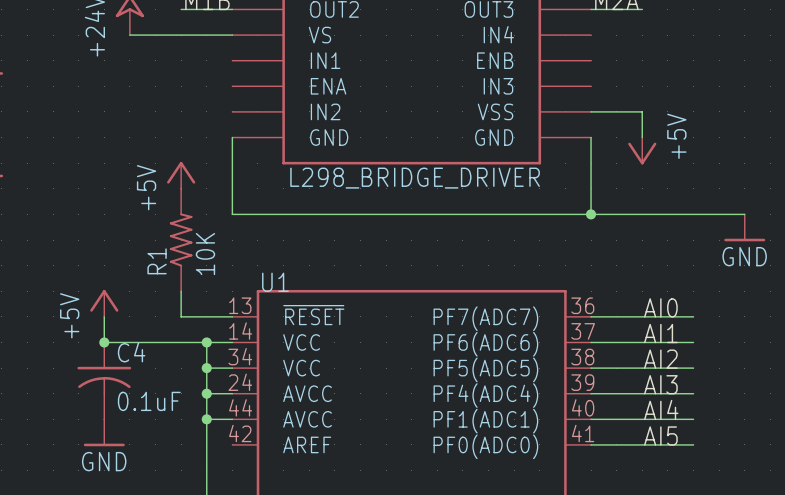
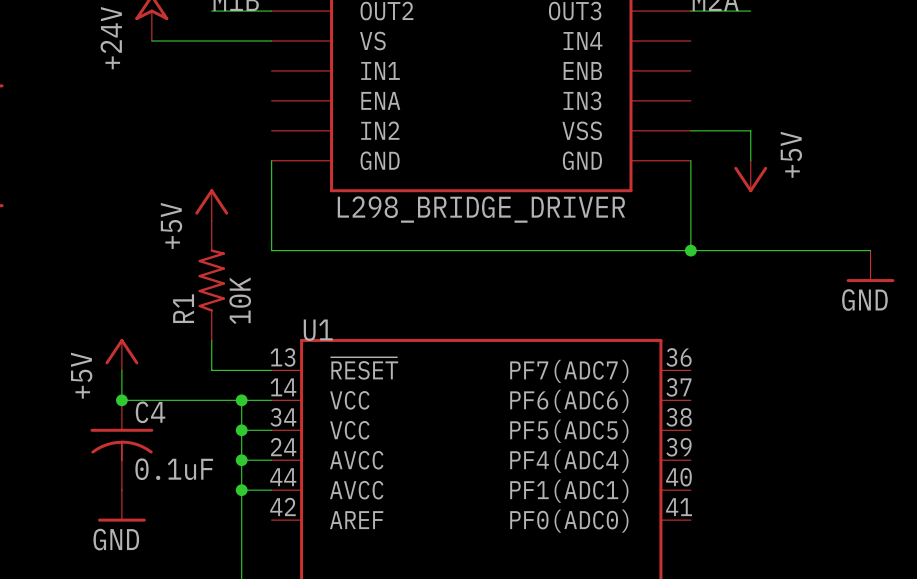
label: AI0 (660, 307) -> none
wire: (591, 316) (693, 316) -> none
label: AI1 (660, 333) -> none
wire: (591, 342) (693, 342) -> none
label: AI2 (660, 359) -> none
wire: (591, 368) (693, 368) -> none
label: AI3 (660, 384) -> none
wire: (591, 393) (693, 393) -> none
label: AI4 (661, 409) -> none
wire: (591, 419) (693, 419) -> none
label: AI5 (660, 435) -> none
wire: (591, 444) (693, 444) -> none

